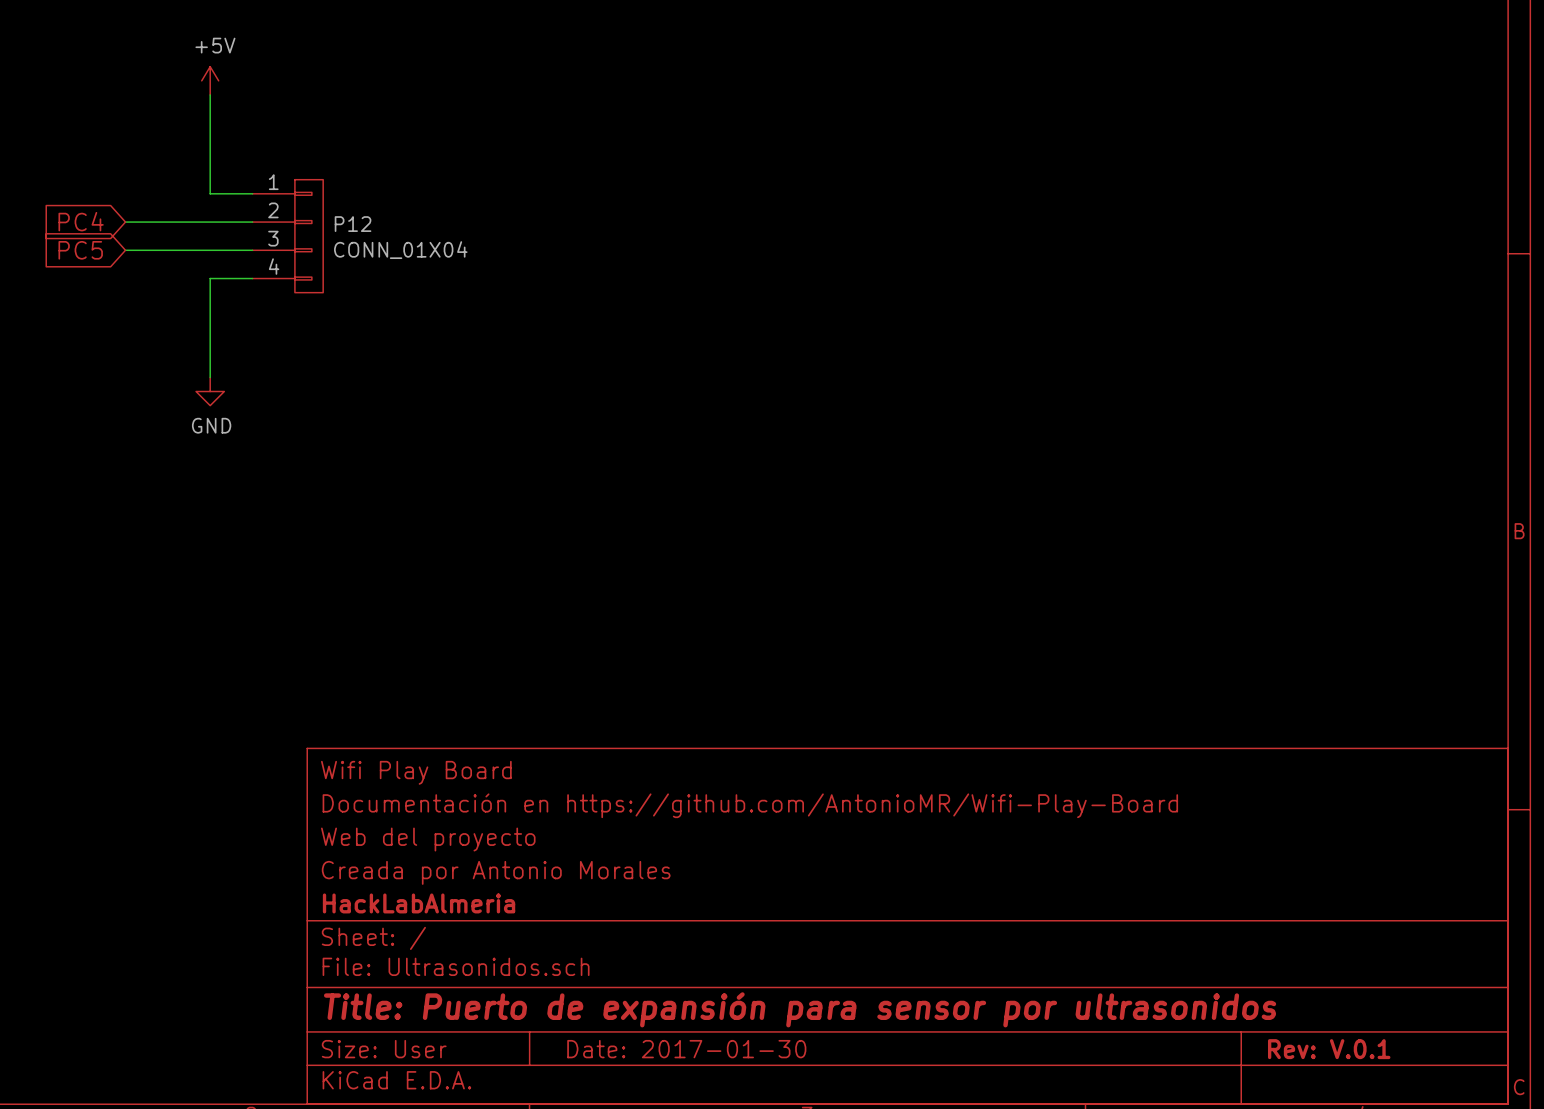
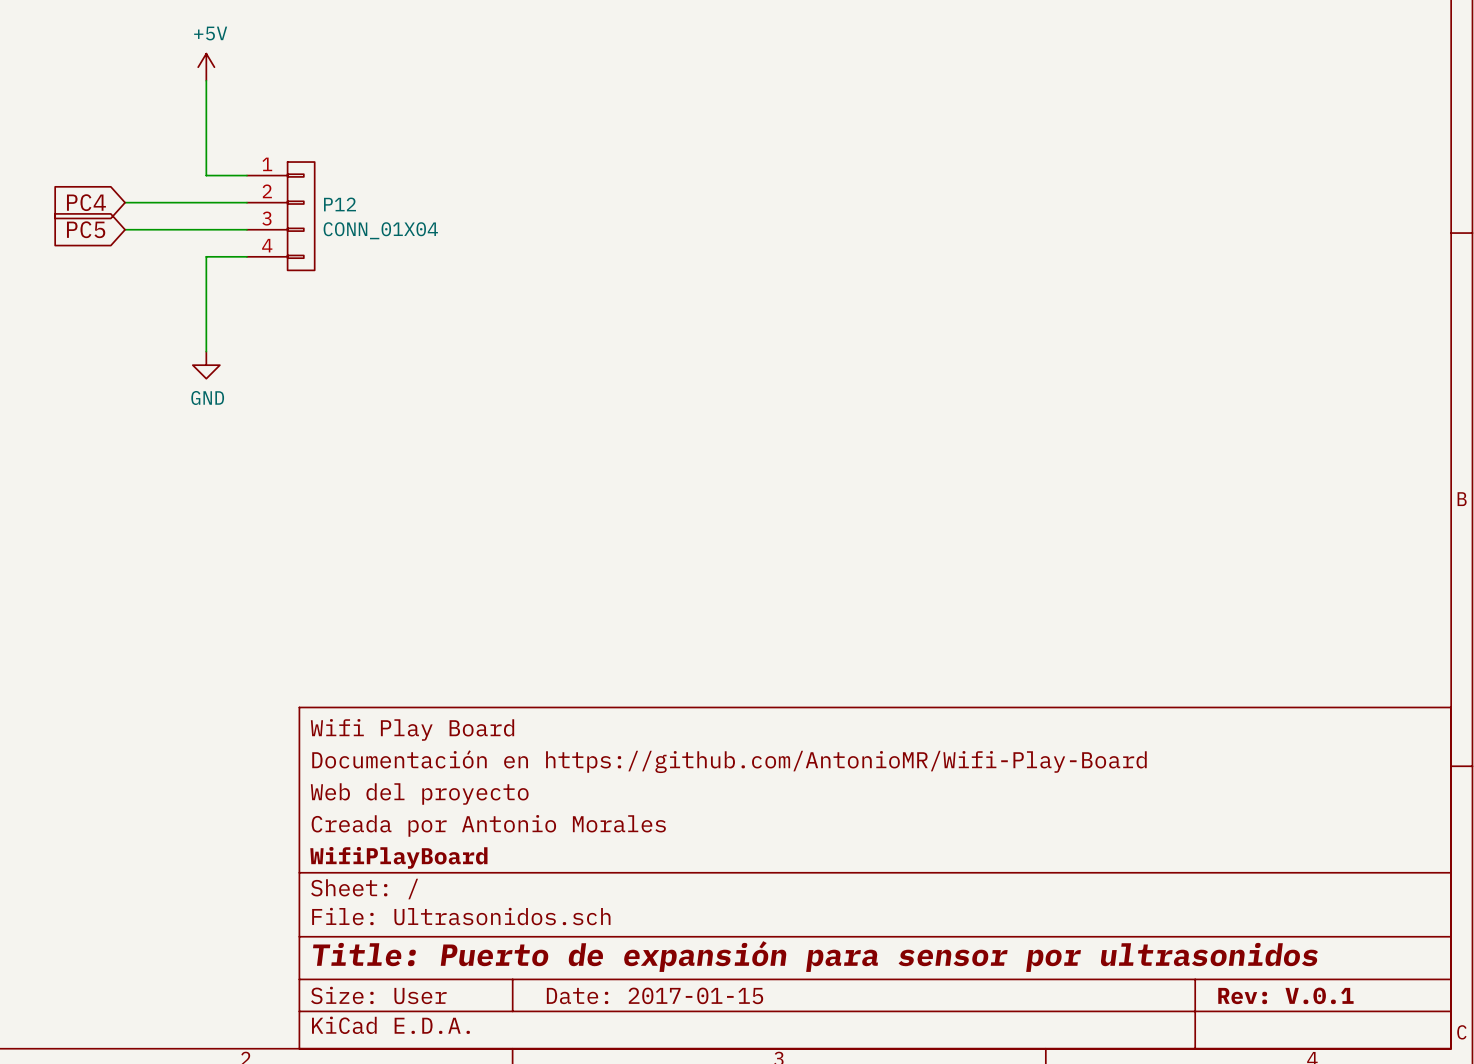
title block: HackLabAlmeria (419, 903) -> WifiPlayBoard (398, 857)
title block: Date: 2017-01-30 (686, 1049) -> Date: 2017-01-15 (655, 995)

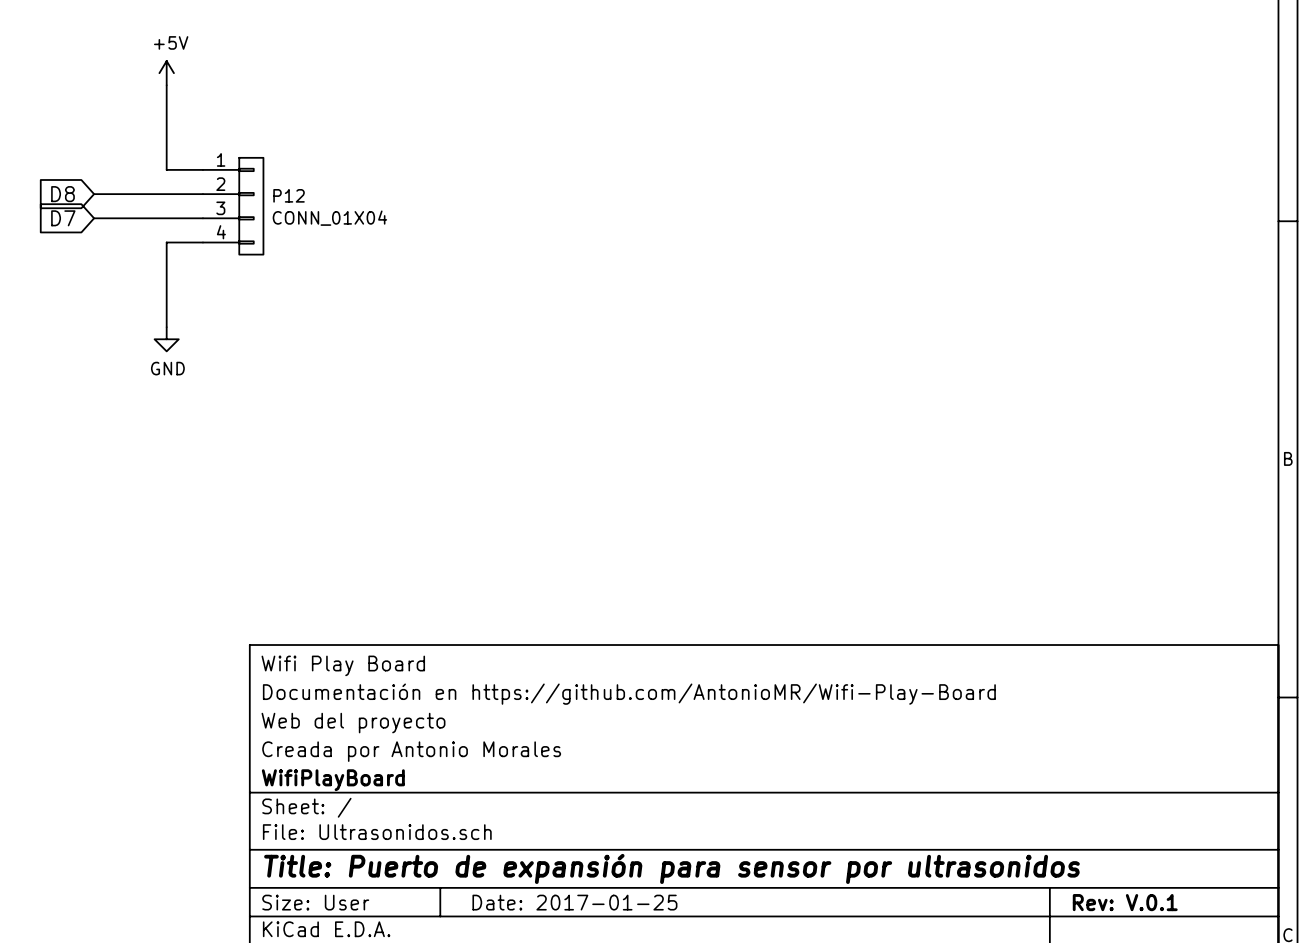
global label: PC4 (86, 202) -> D8 (62, 194)
global label: PC5 (86, 229) -> D7 (63, 218)
title block: Date: 2017-01-15 (655, 995) -> Date: 2017-01-25 (574, 902)

